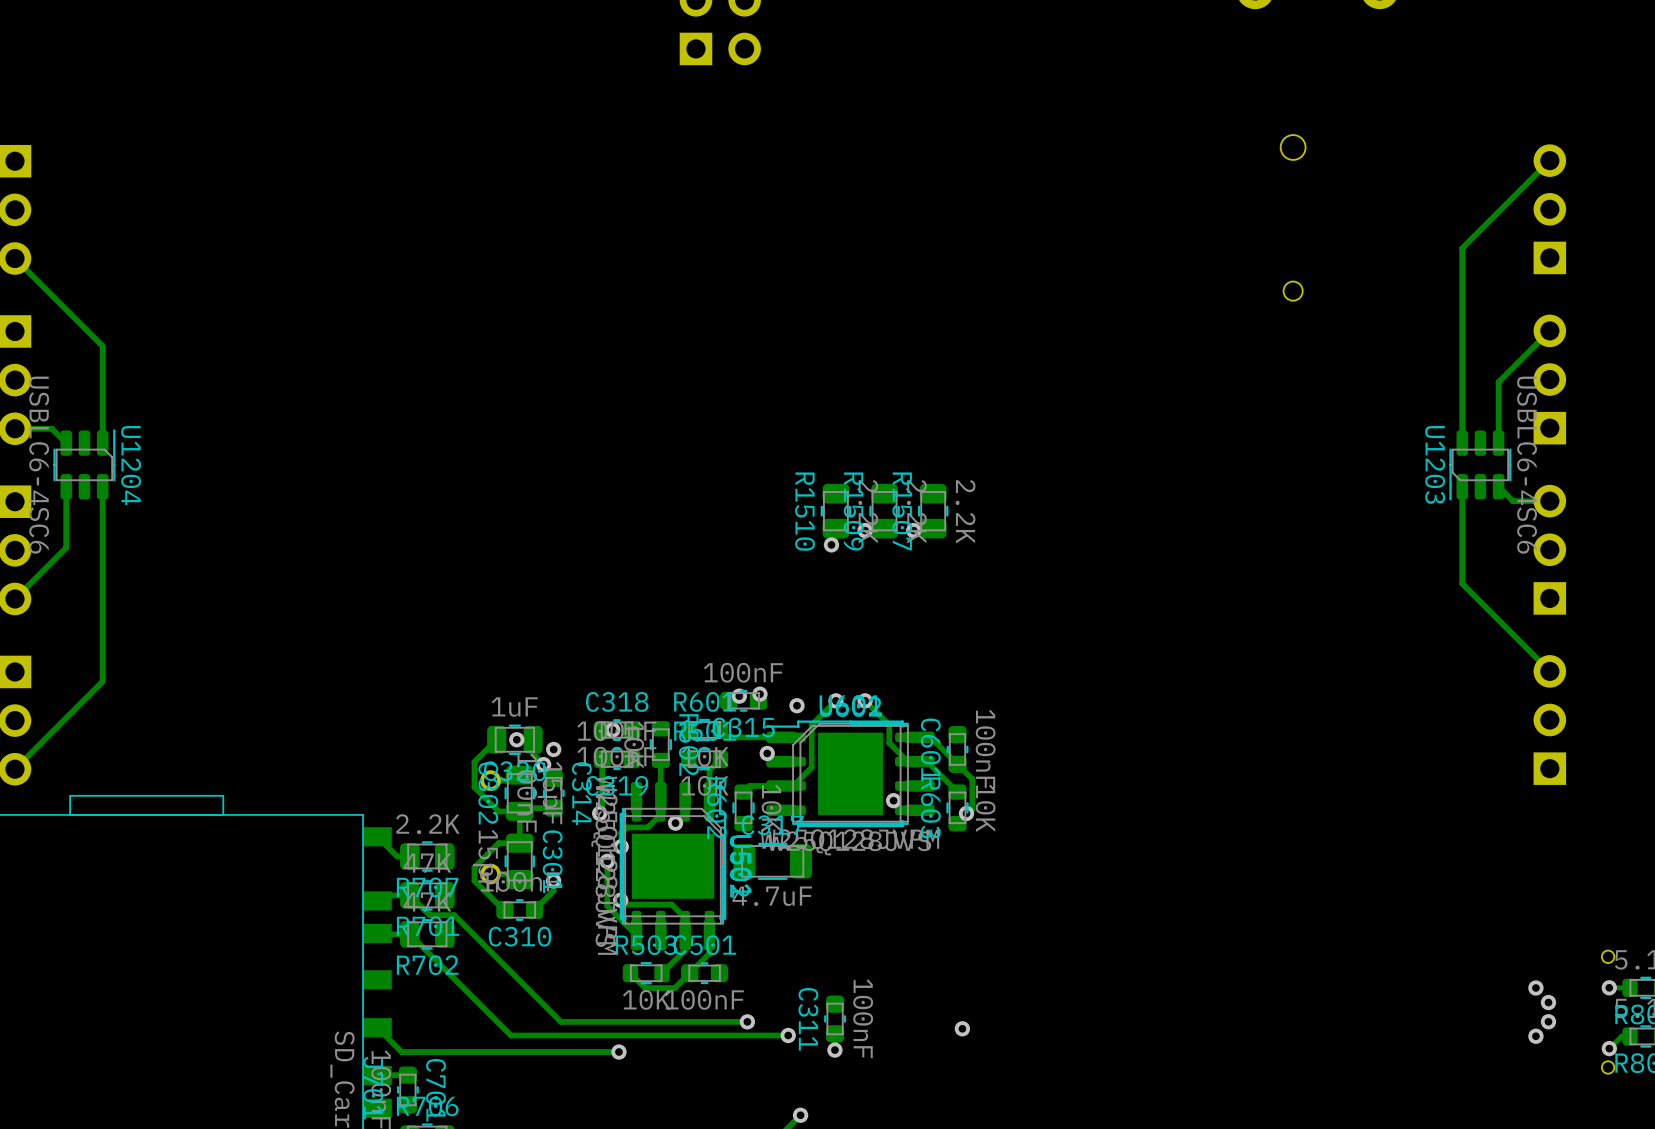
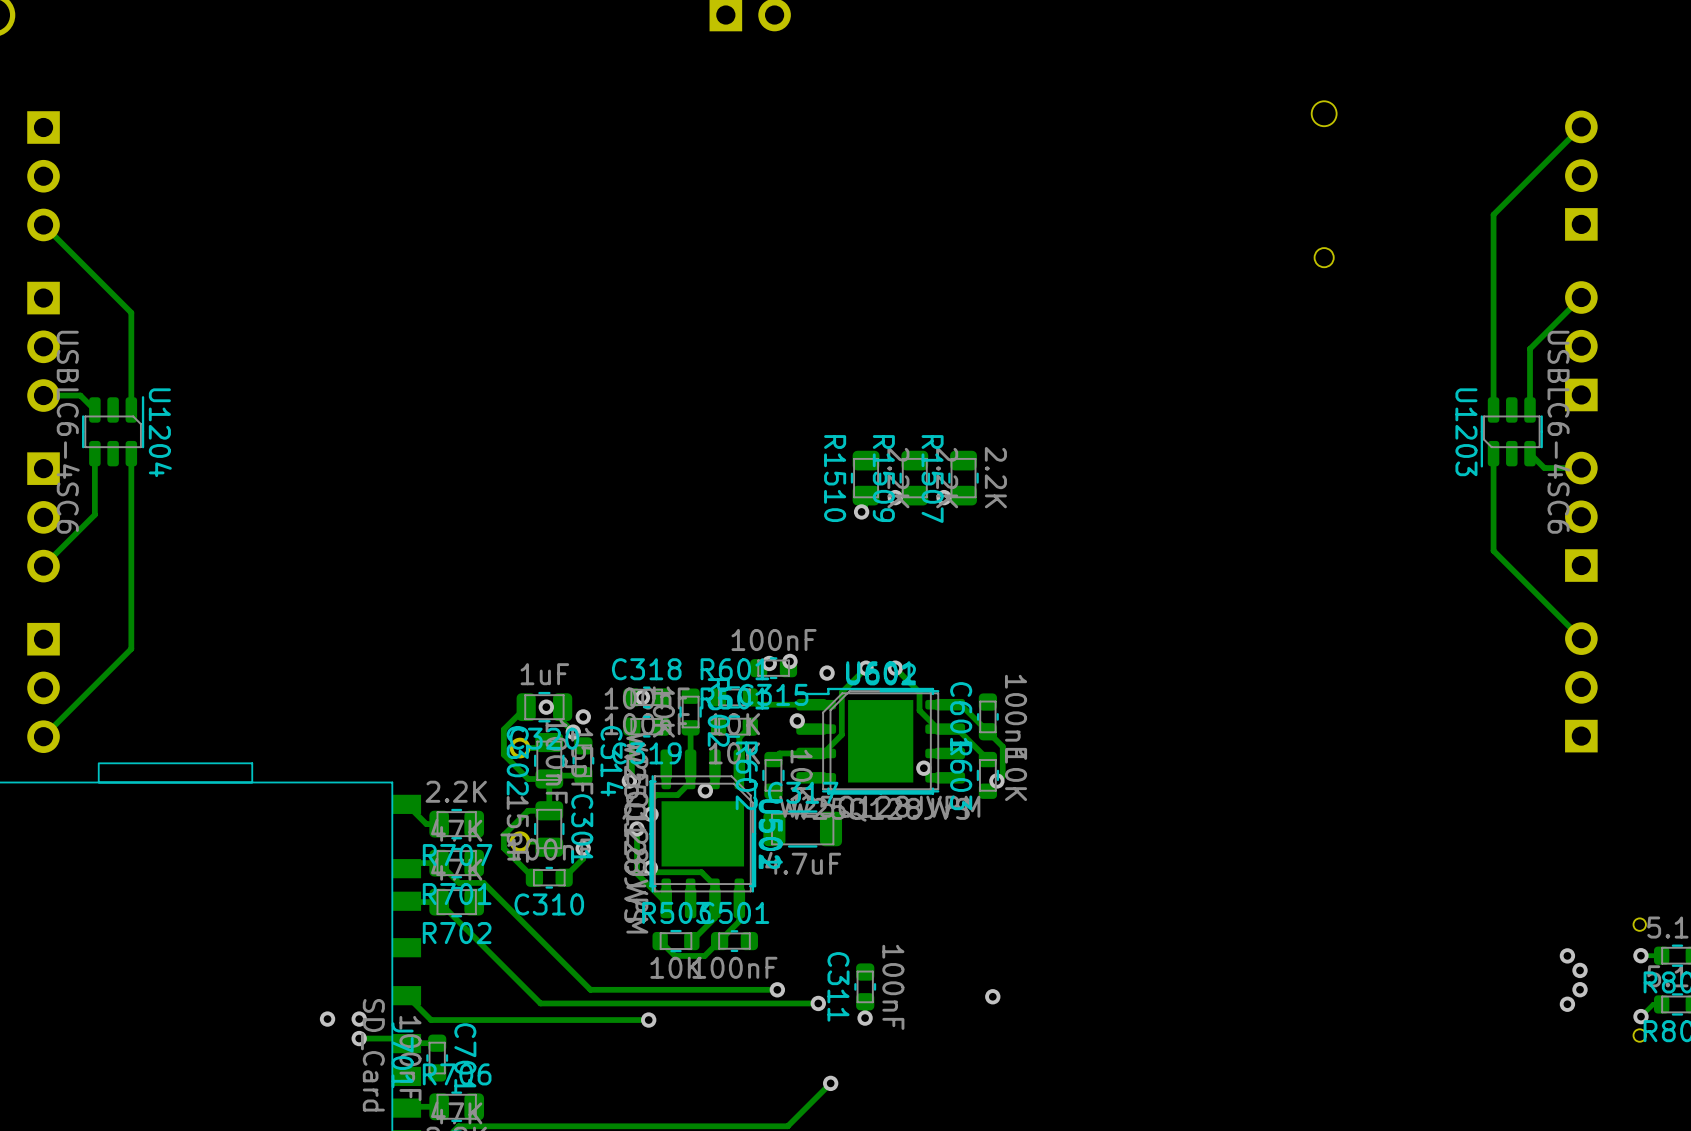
via: none -> (327, 1019)
via: none -> (359, 1019)
track: none -> (359, 1038) (401, 1038) (406, 1043)
via: none -> (359, 1038)

